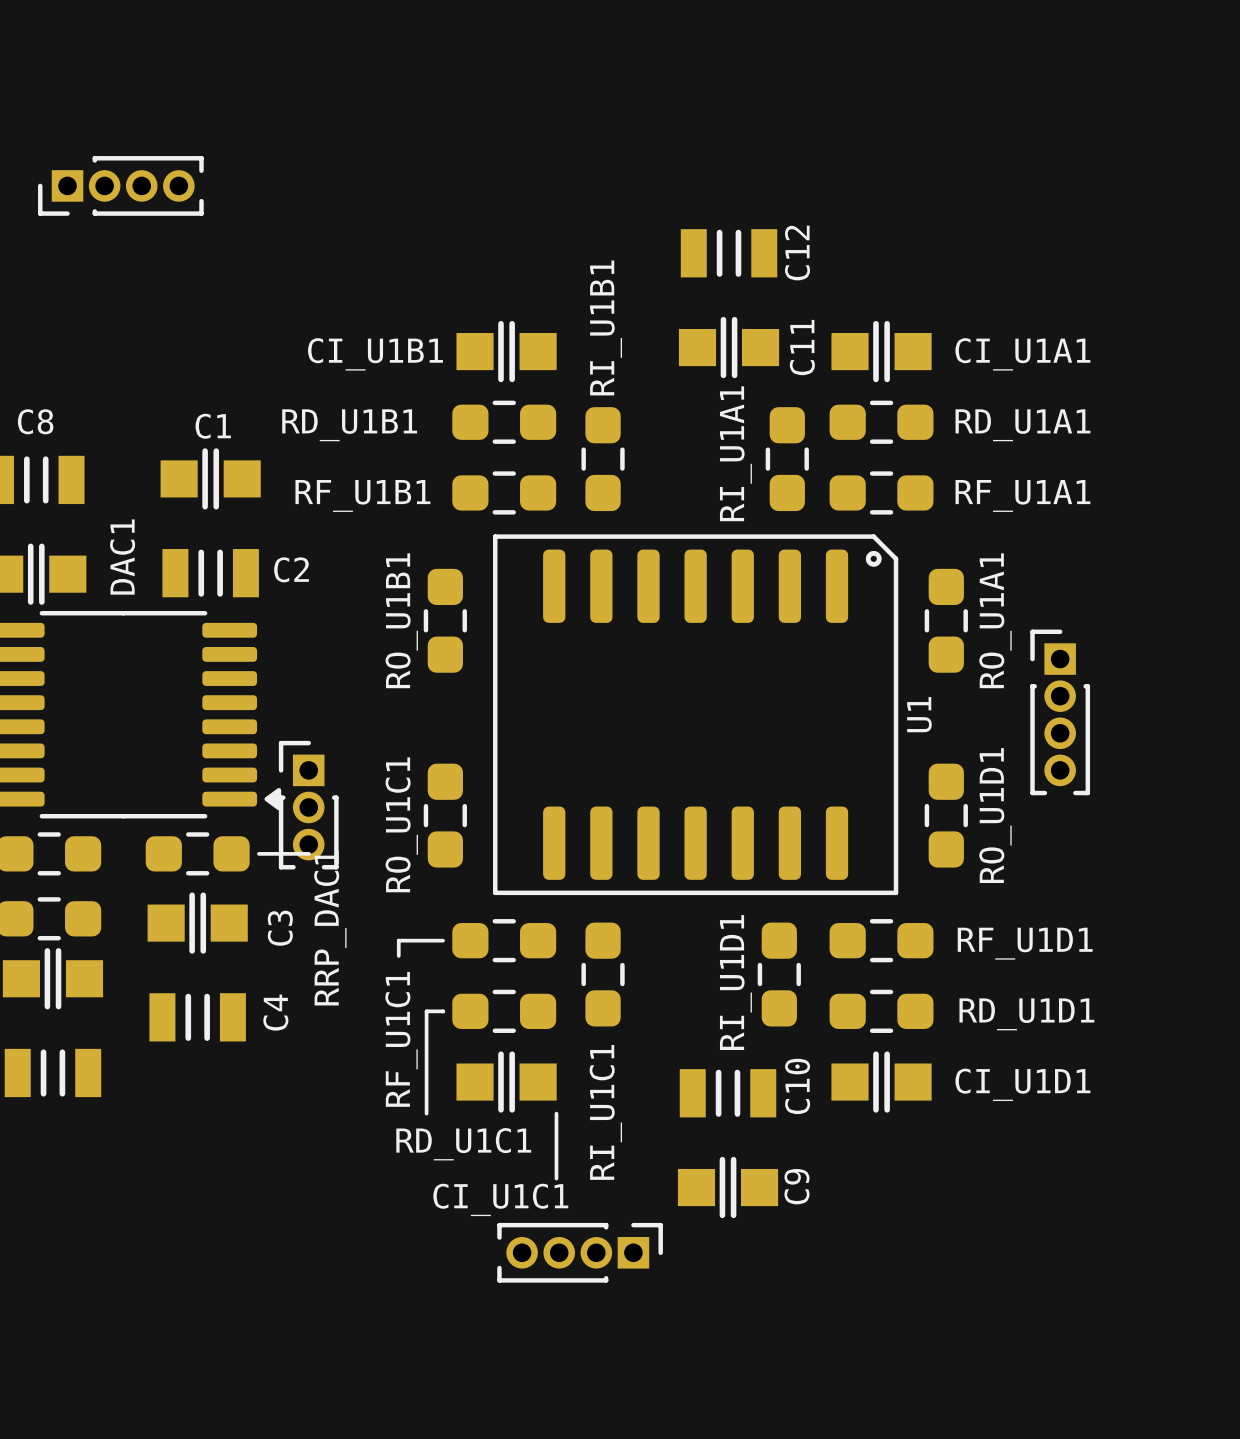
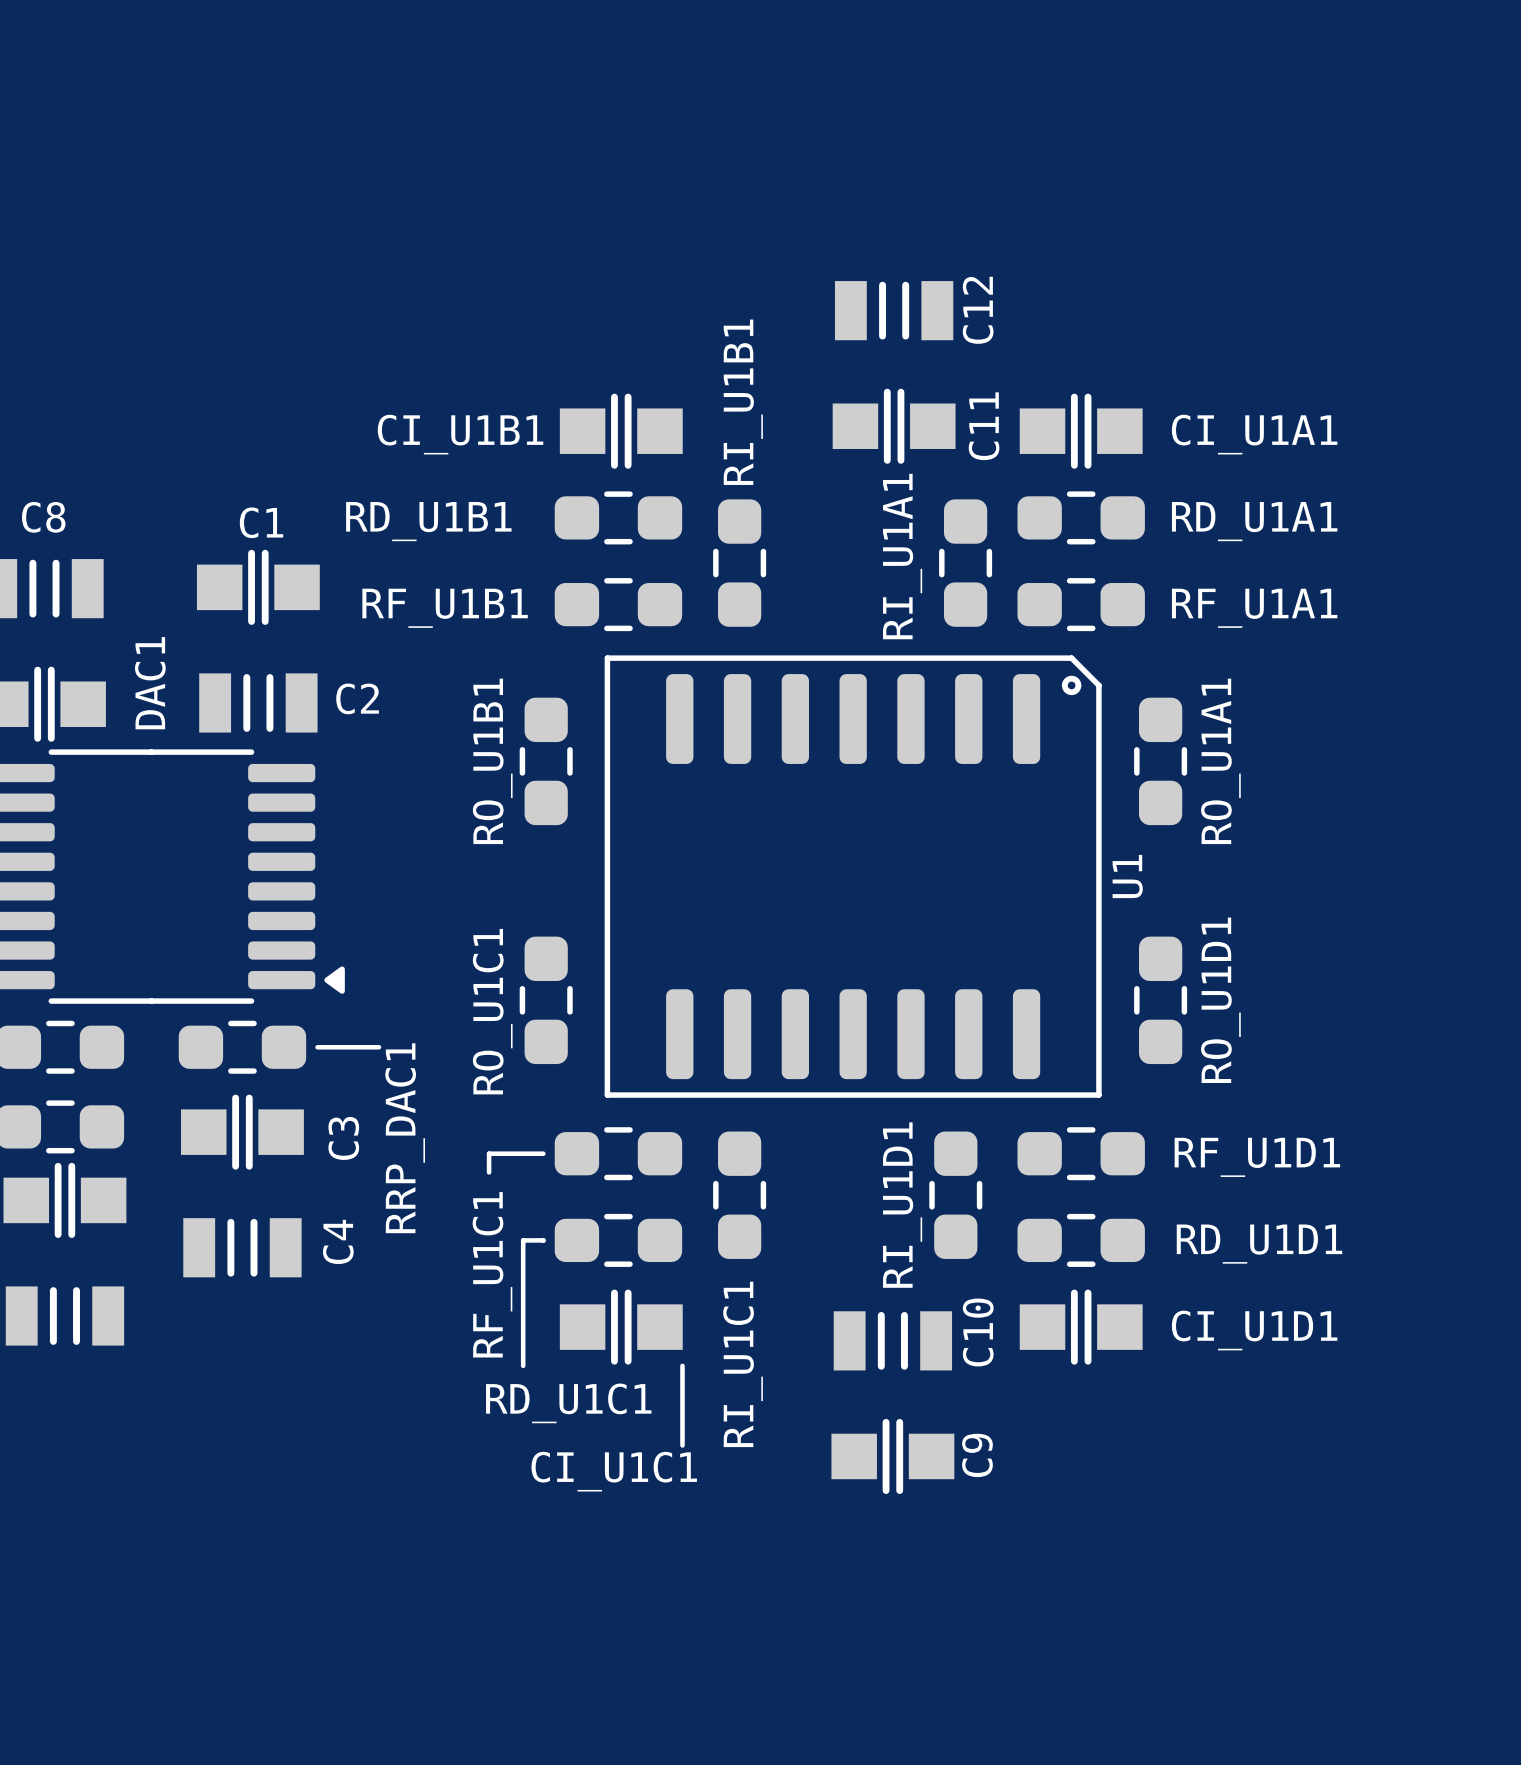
part: (120, 185) -> none
part: (1060, 712) -> none
part: (308, 805) -> none
part: (580, 1252) -> none

